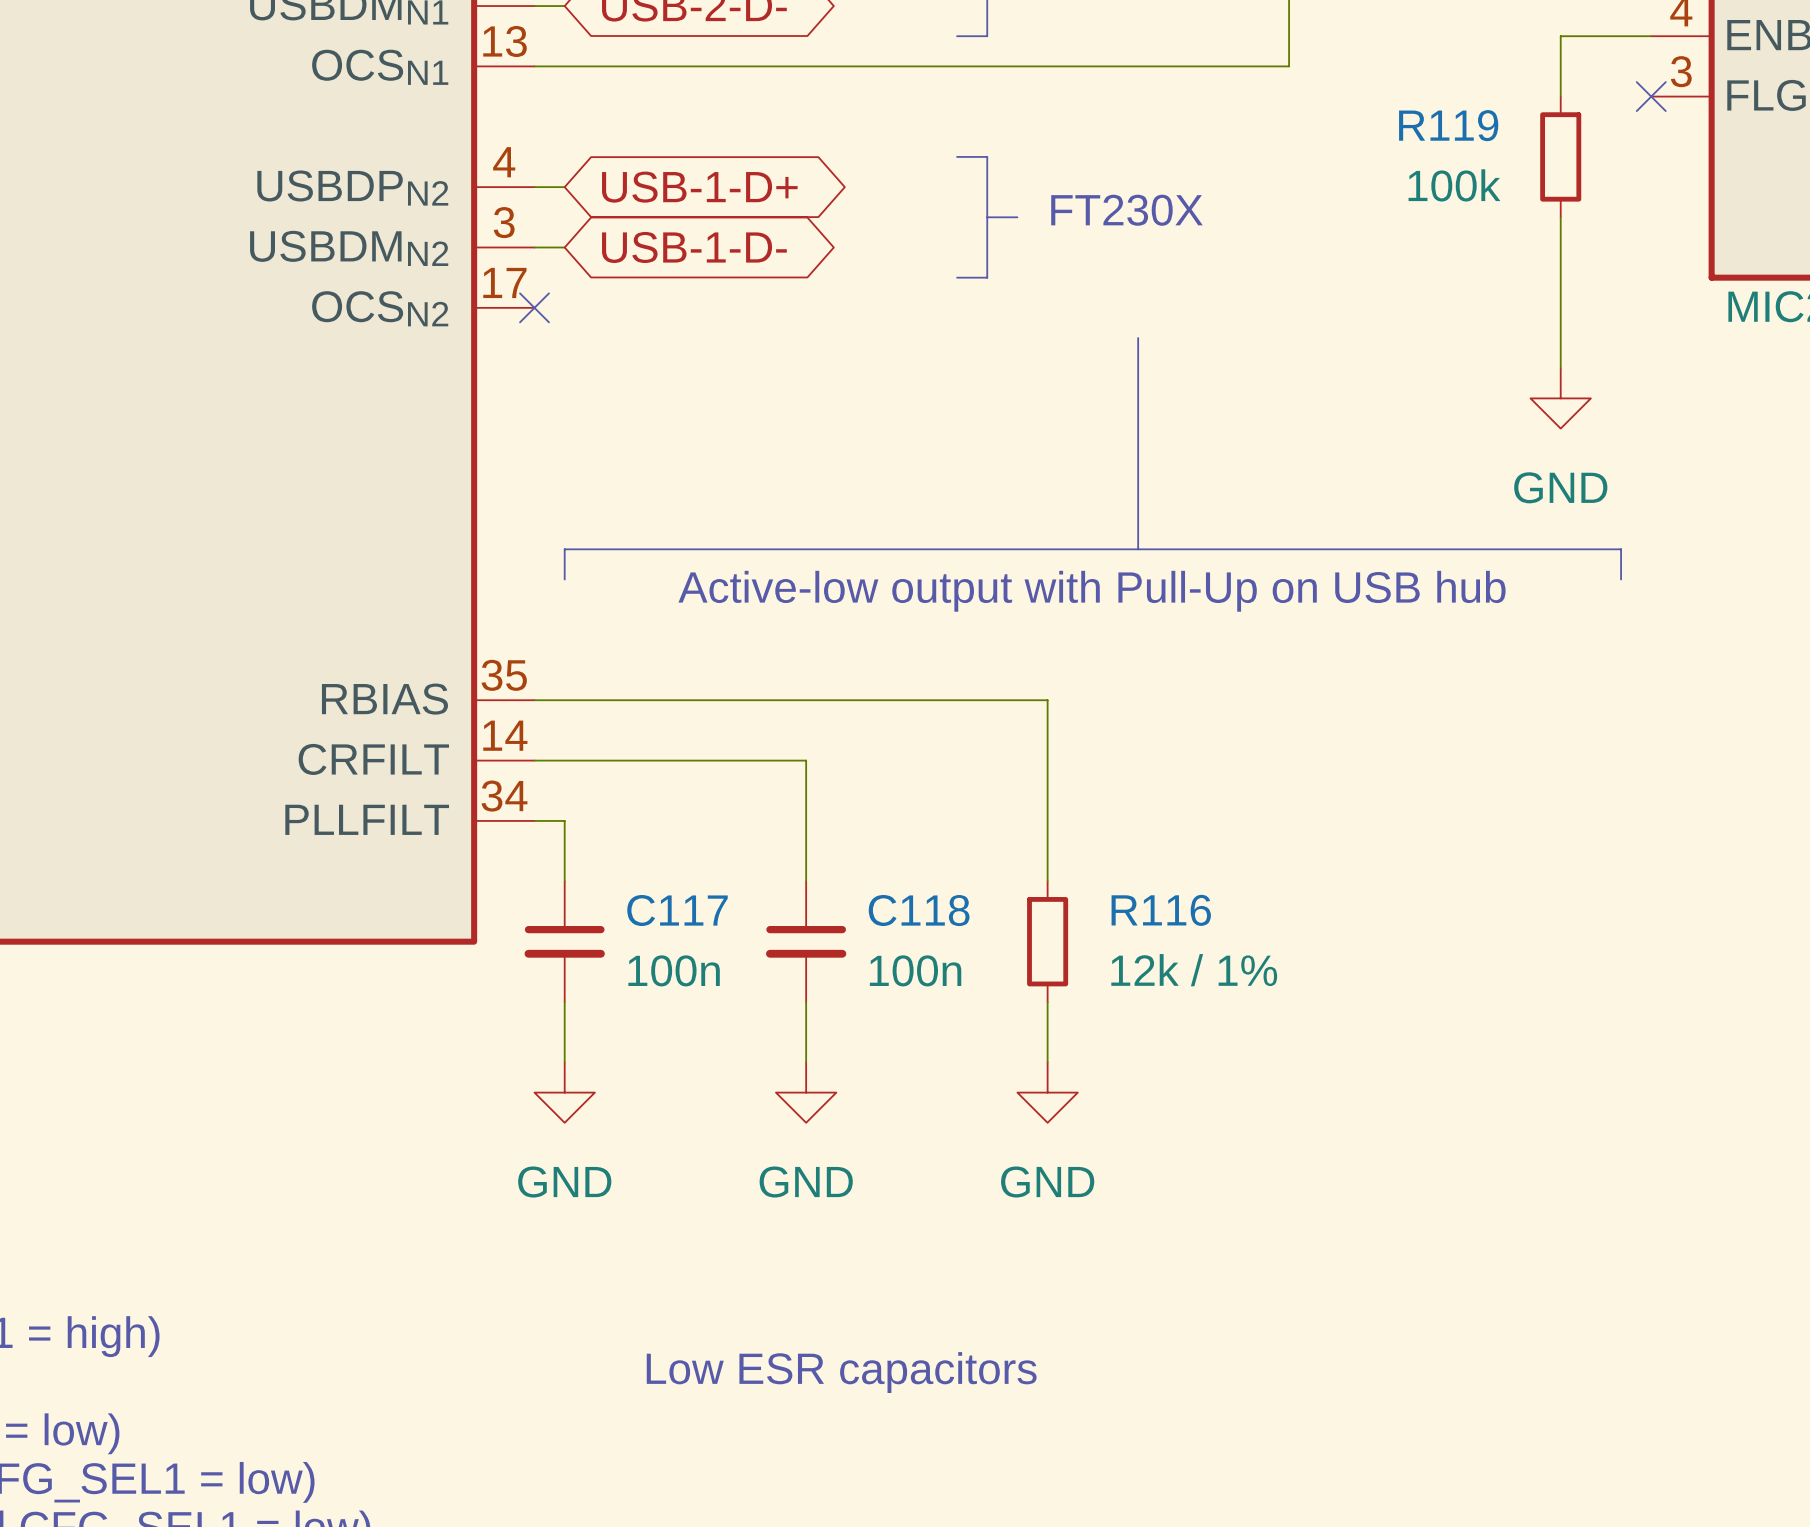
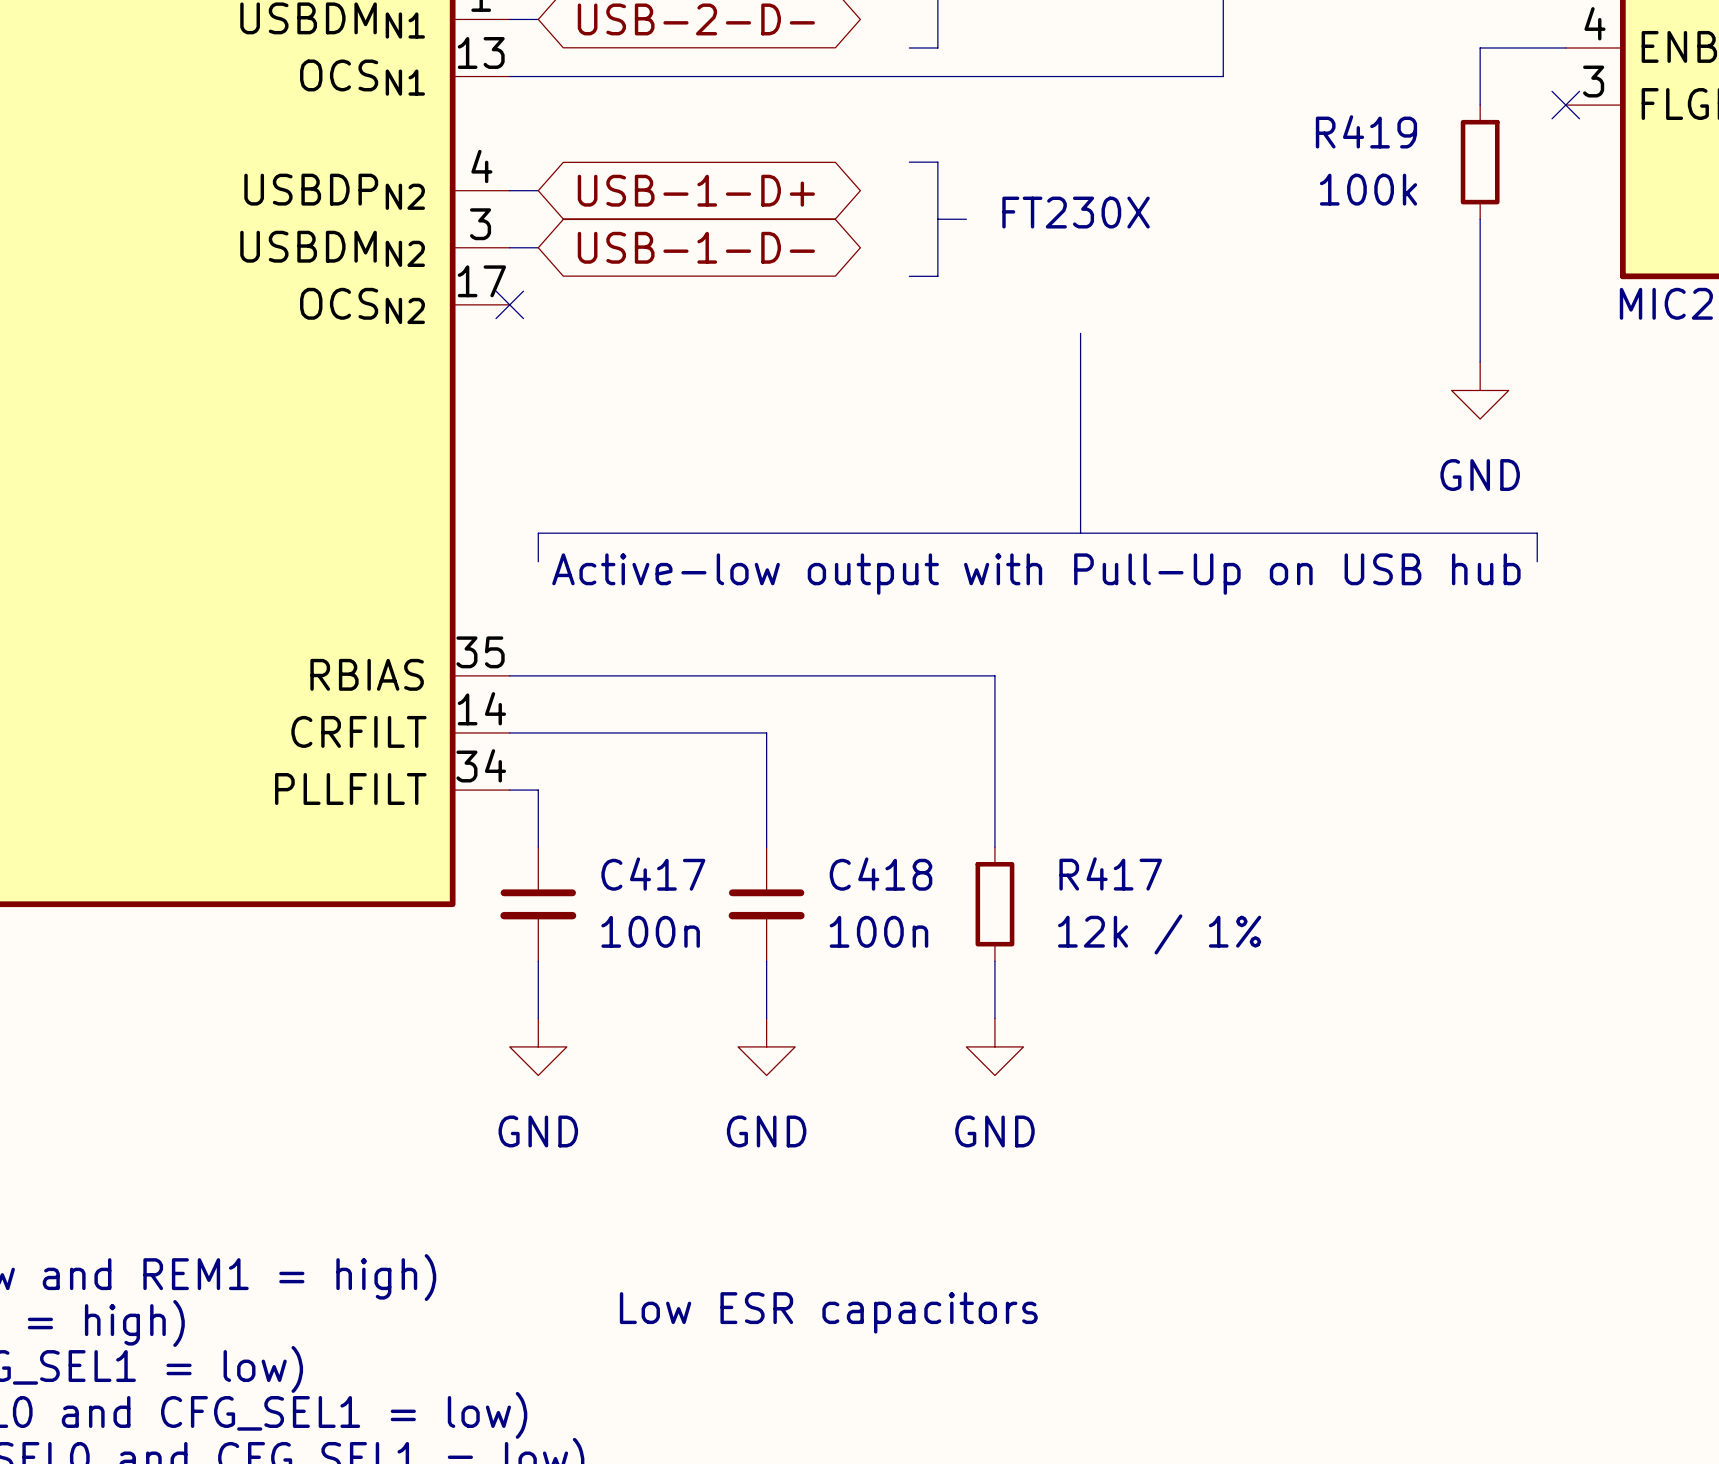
R119 name: R119 (1448, 125) -> R419 (1366, 131)
C117 name: C117 (677, 910) -> C417 (653, 874)
C118 name: C118 (919, 910) -> C418 (881, 874)
R116 name: R116 (1161, 910) -> R417 (1110, 873)

